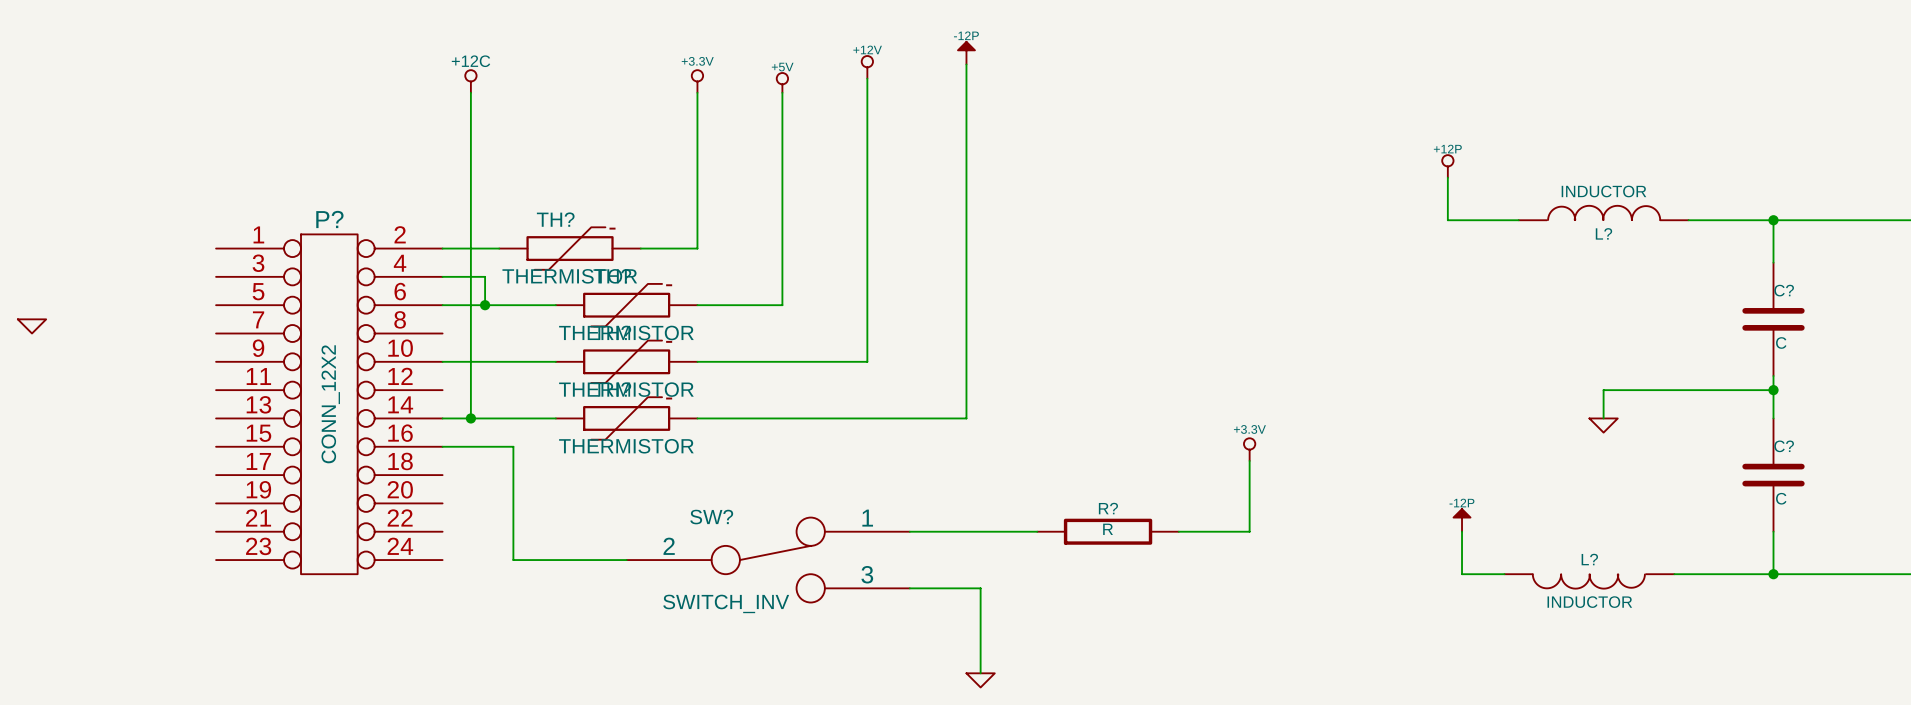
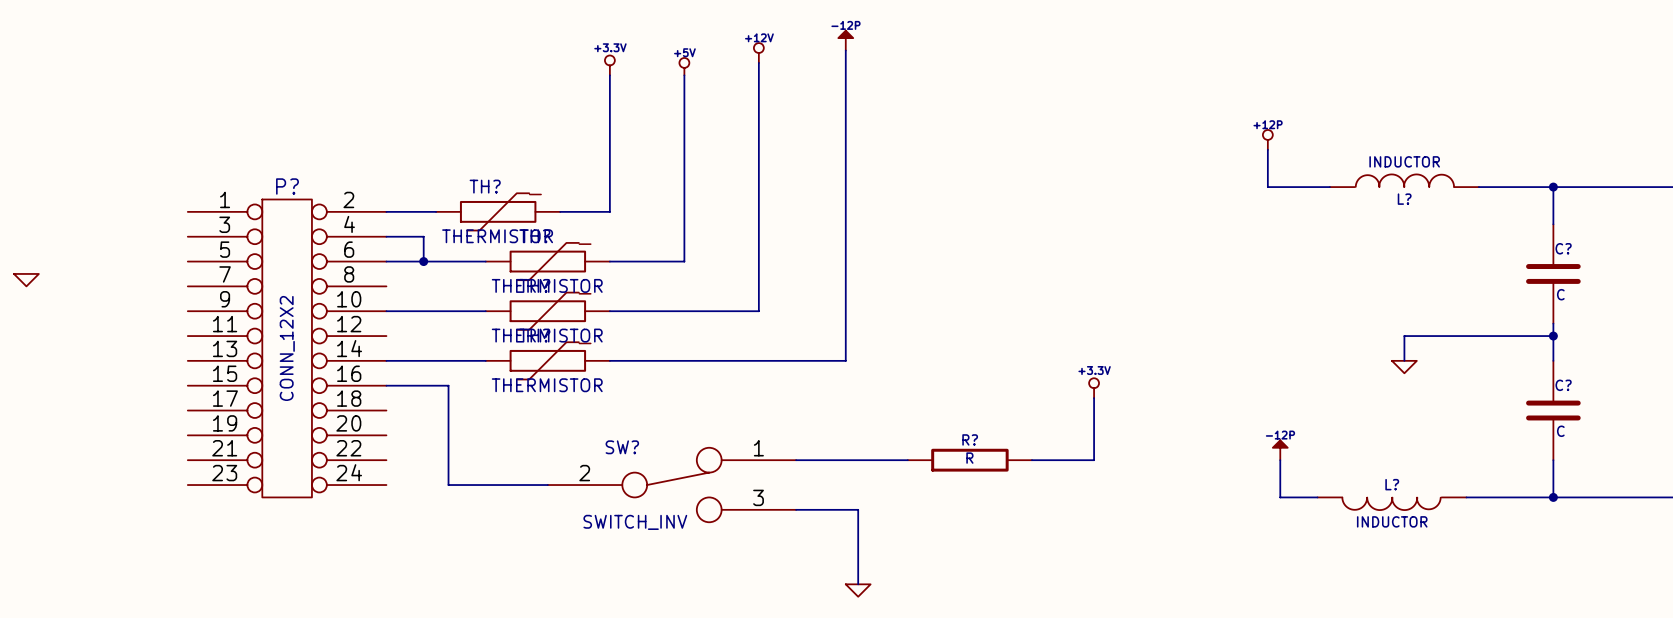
power symbol: +12C (470, 81) -> none
wire: (470, 92) (470, 418) -> none
junction: (470, 418) -> none

